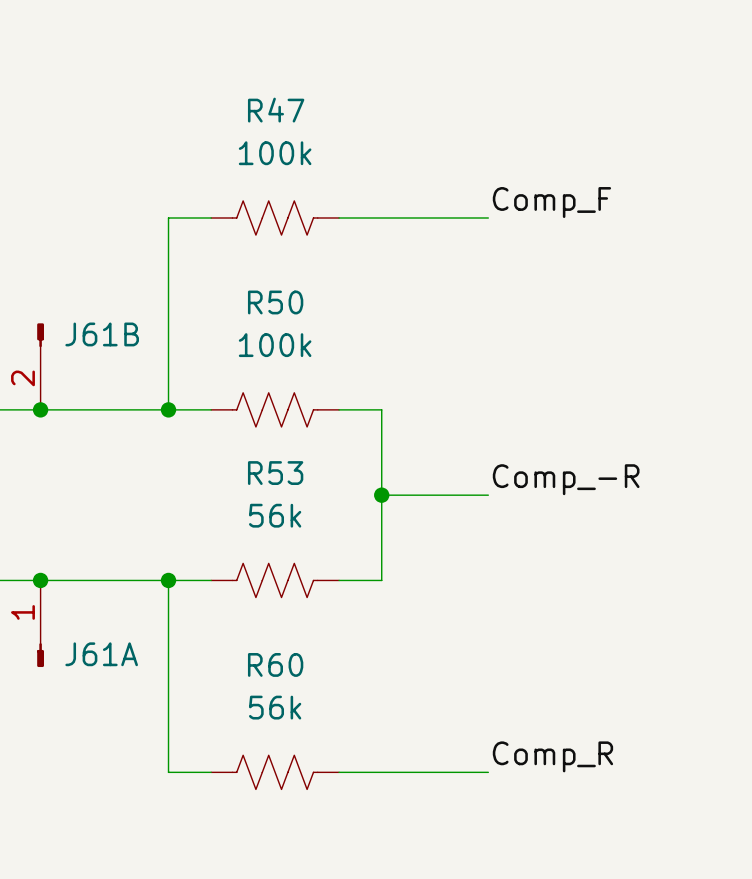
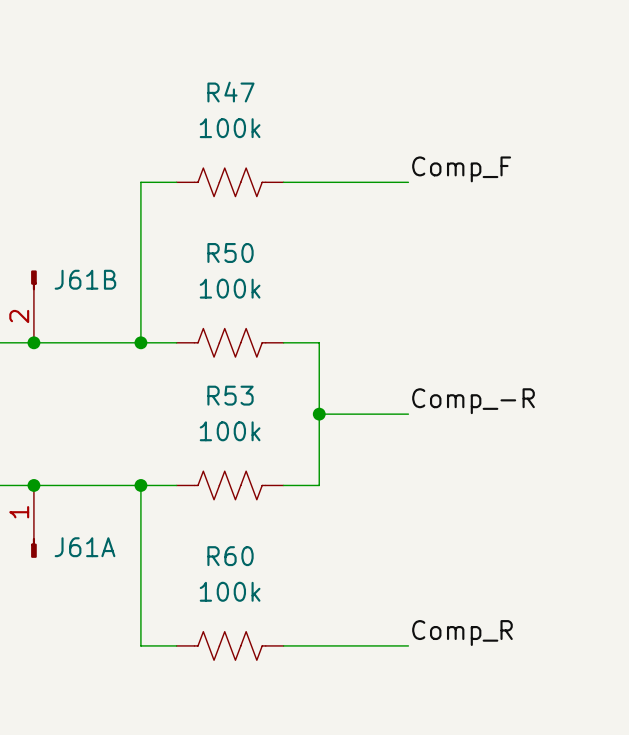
R53 value: 56k (275, 515) -> 100k (230, 431)
R60 value: 56k (275, 707) -> 100k (230, 591)

